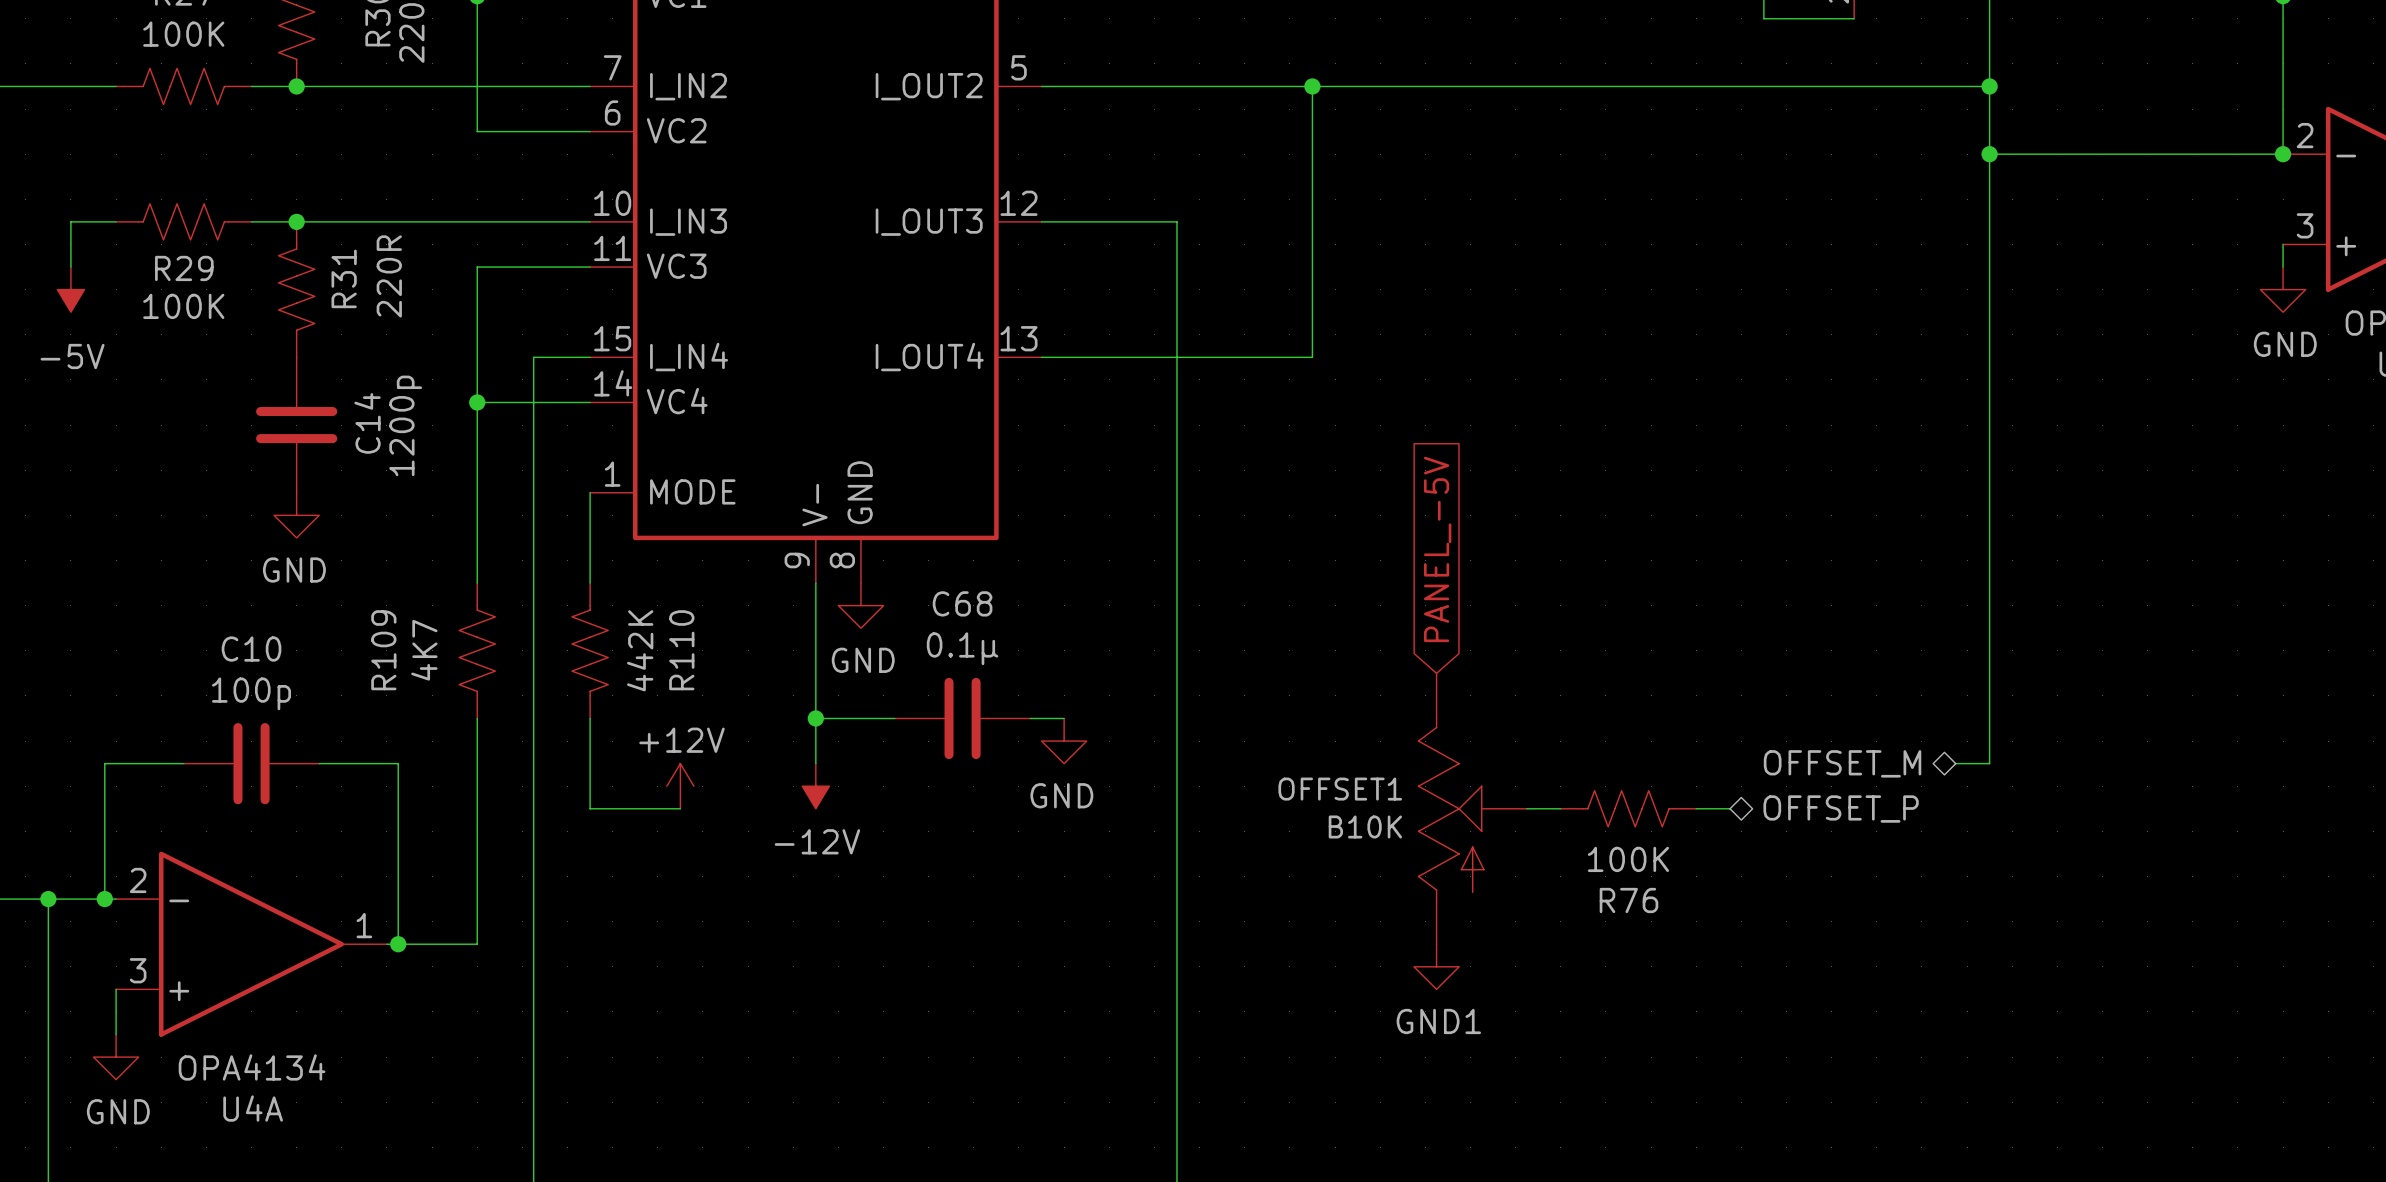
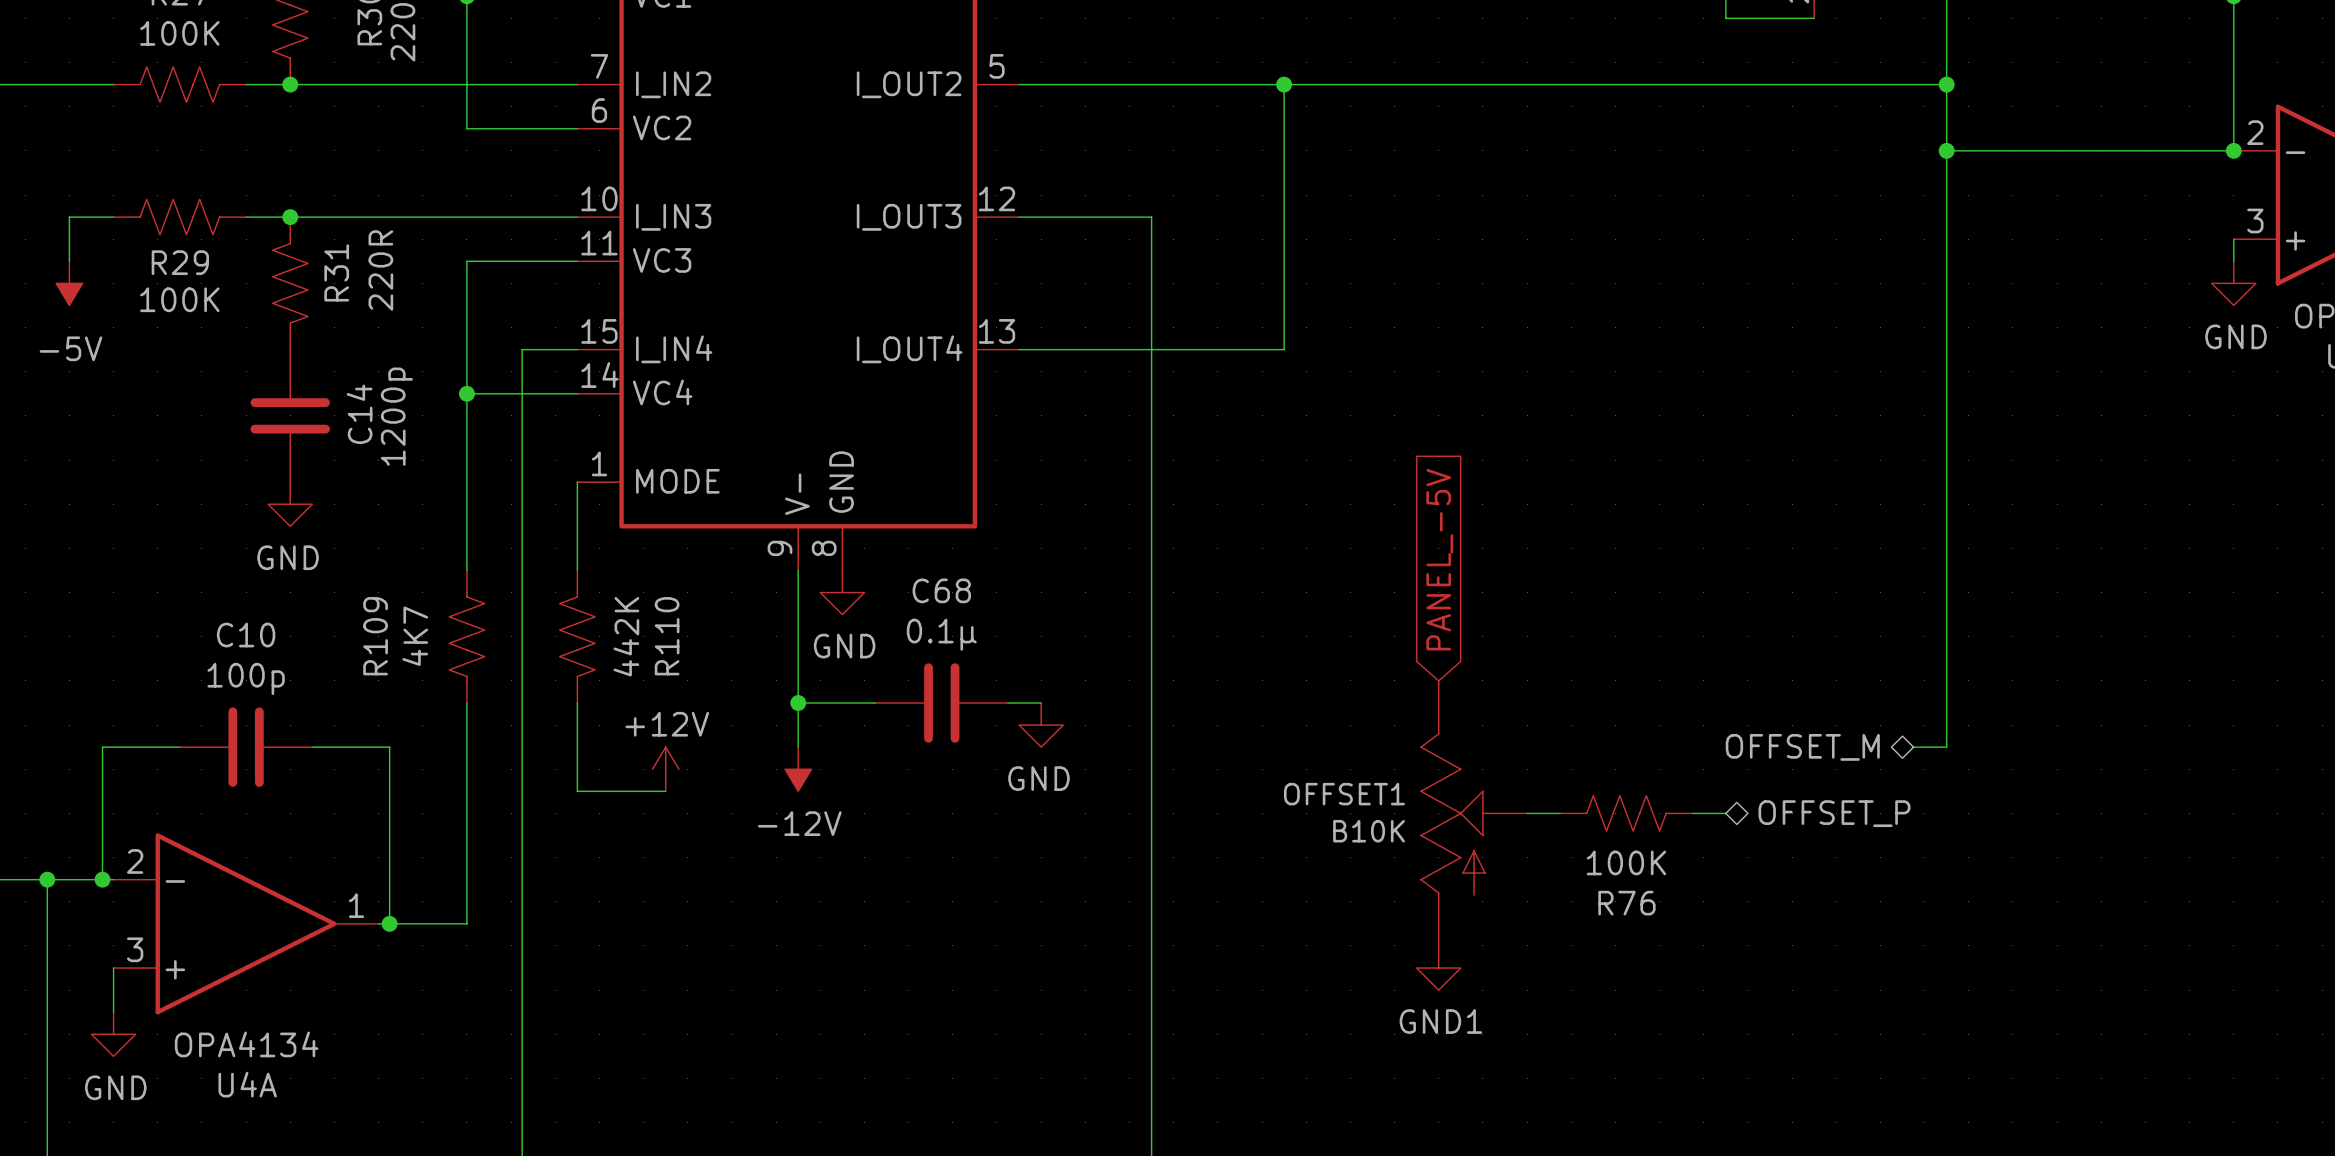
global label position: PANEL_-5V (1437, 549) -> PANEL_-5V (1439, 559)
OFFSET1 position: (1472, 808) -> (1474, 813)
wire: (1526, 808) (1560, 808) -> (1527, 813) (1560, 813)
R76 position: (1628, 808) -> (1626, 813)
wire: (1696, 808) (1730, 808) -> (1692, 813) (1725, 813)
hierarchical label position: OFFSET_P (1841, 809) -> OFFSET_P (1834, 813)
power symbol position: GND1 (1436, 966) -> GND1 (1438, 968)

